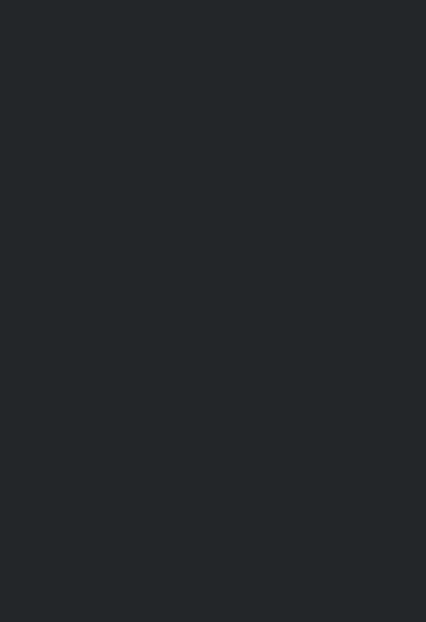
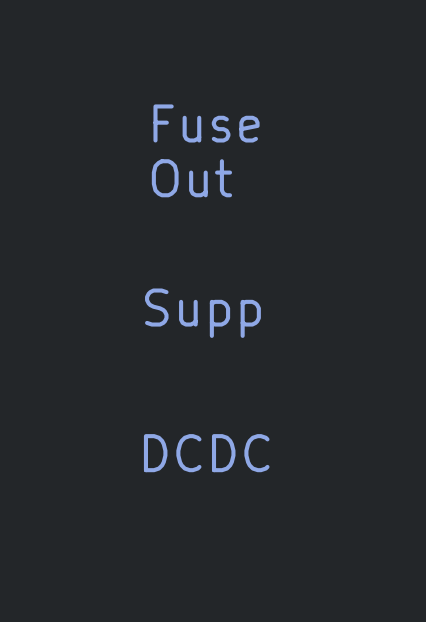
text: none -> Fuse (206, 123)
text: none -> Out (191, 178)
text: none -> Supp (202, 313)
text: none -> DCDC (206, 453)

